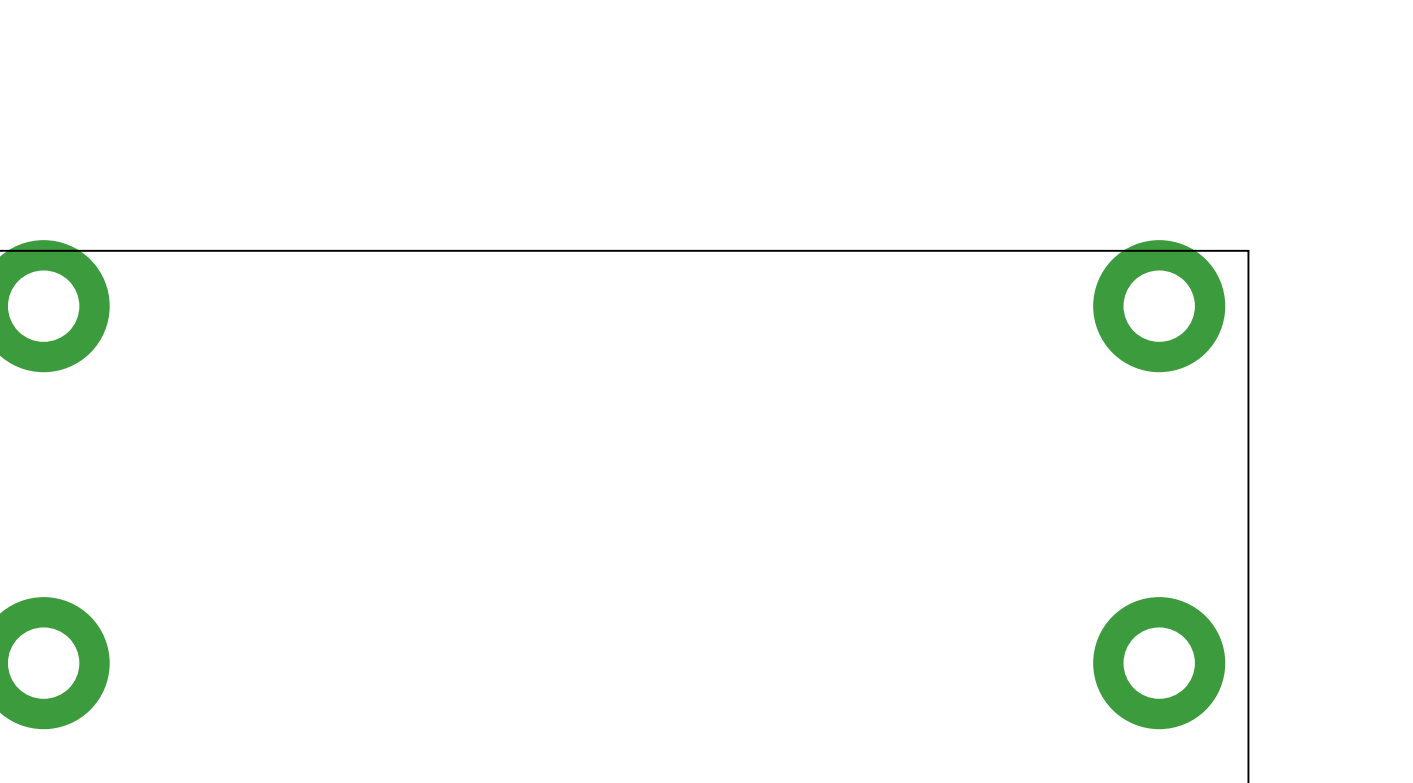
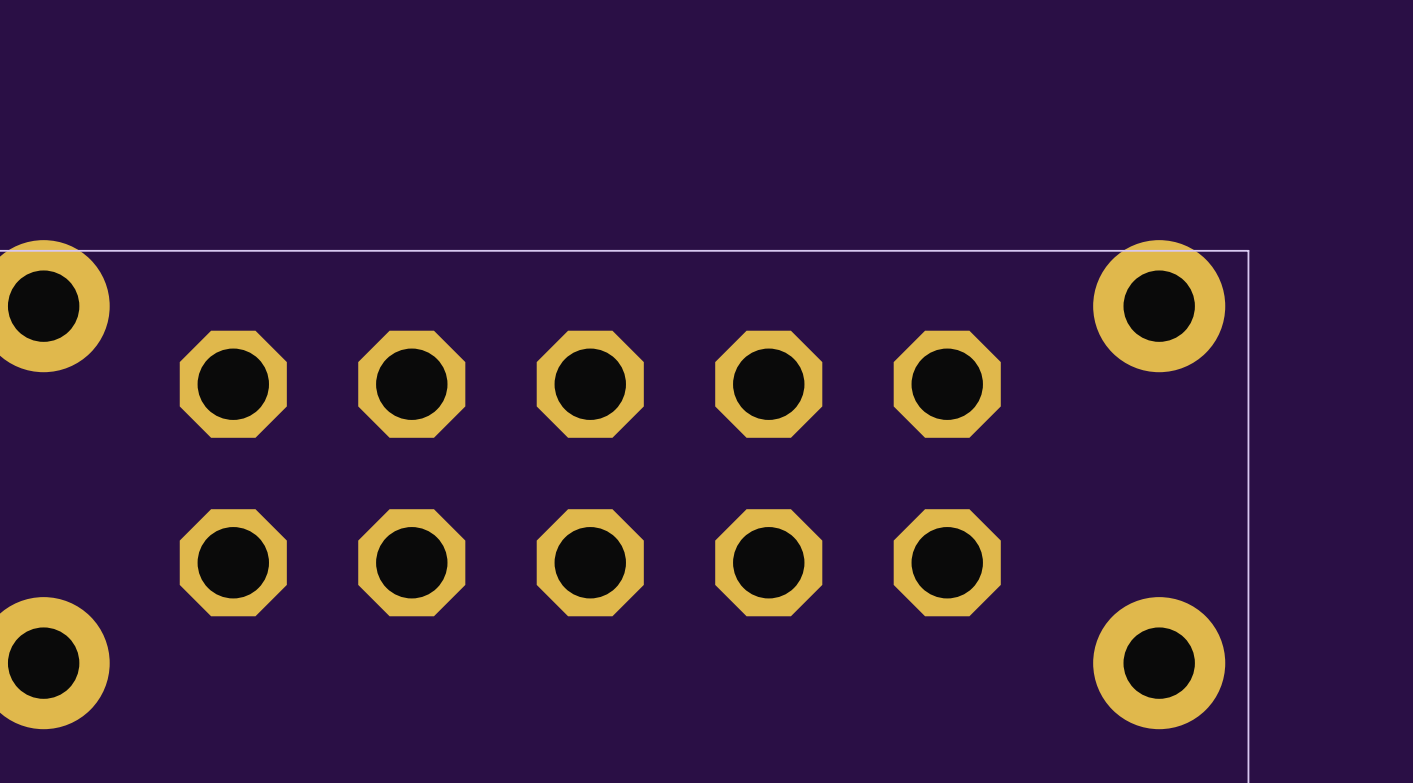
part: none -> (590, 473)

